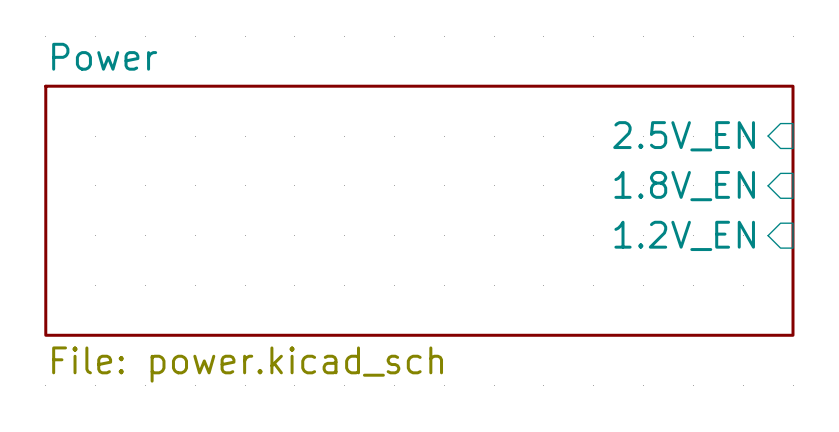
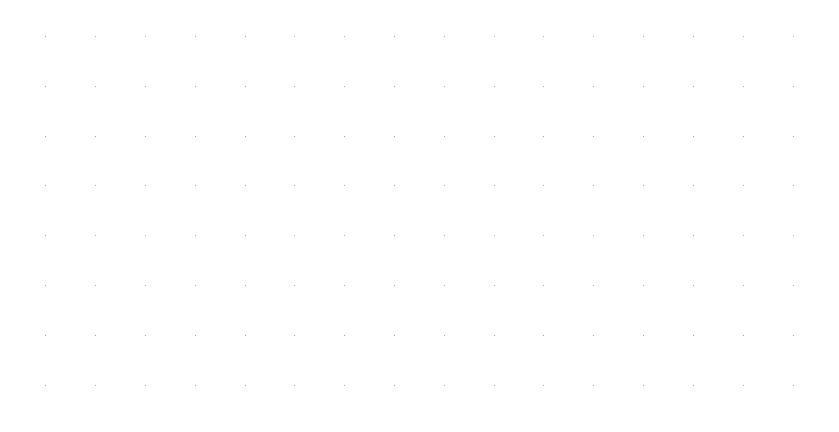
sheet pin: 2.5V_EN (684, 136) -> none
sheet pin: 1.8V_EN (684, 186) -> none
sheet Power: File: power.kicad_sch (419, 210) -> none
sheet pin: 1.2V_EN (684, 235) -> none

